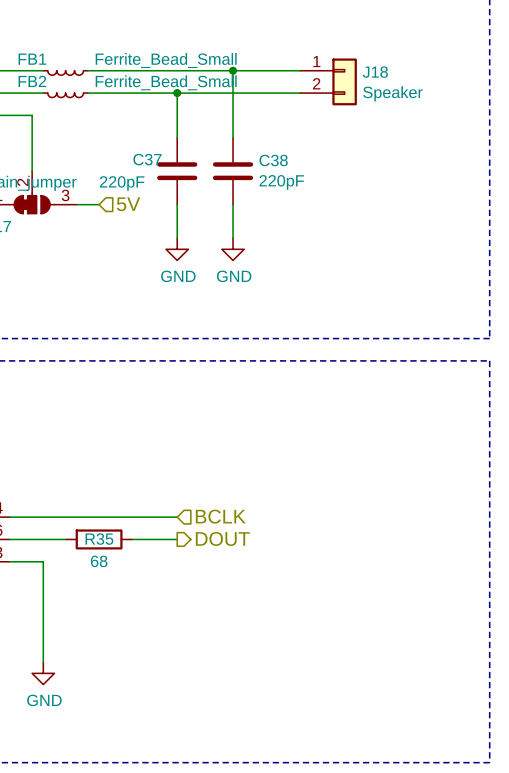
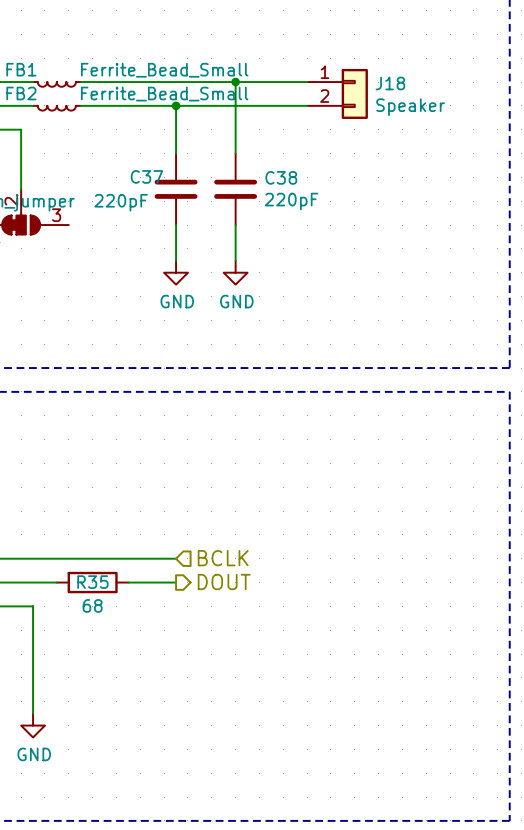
wire: (76, 204) (99, 204) -> none
hierarchical label: 5V (128, 204) -> none

